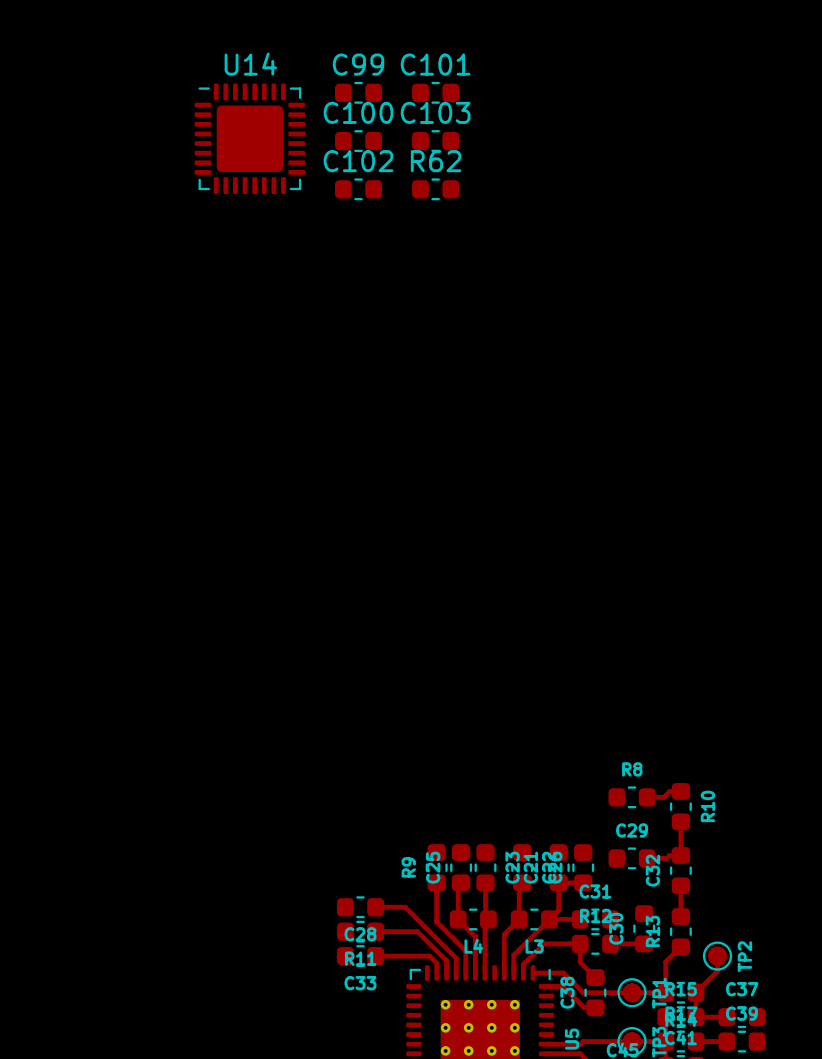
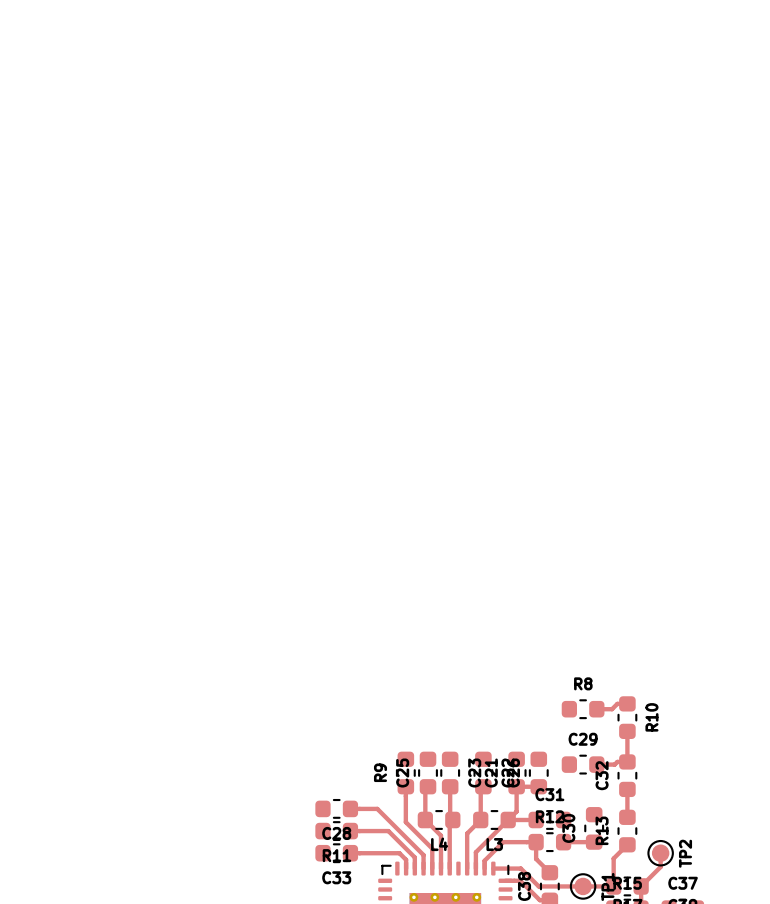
C99: (358, 92) -> none
C101: (435, 92) -> none
U14: (249, 138) -> none
C100: (358, 141) -> none
C103: (435, 141) -> none
C102: (358, 189) -> none
R62: (435, 189) -> none

